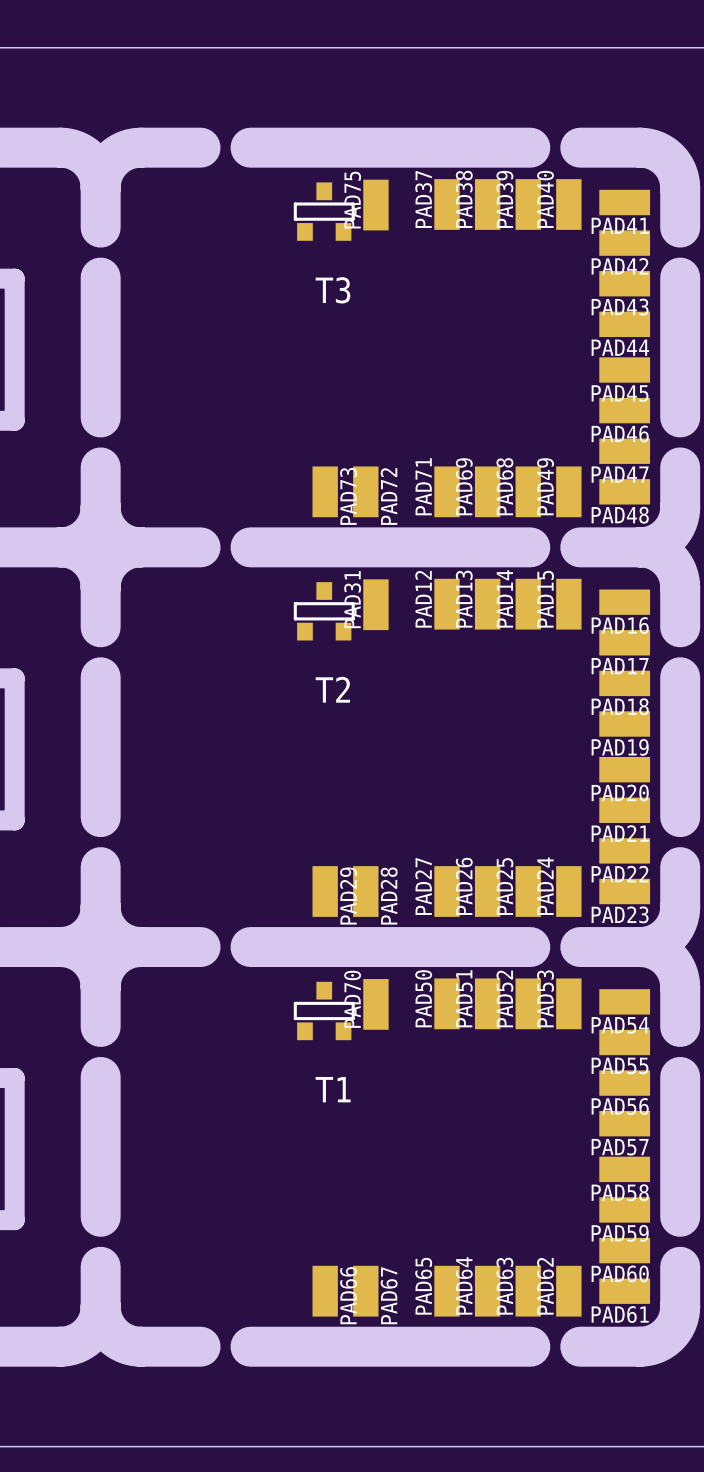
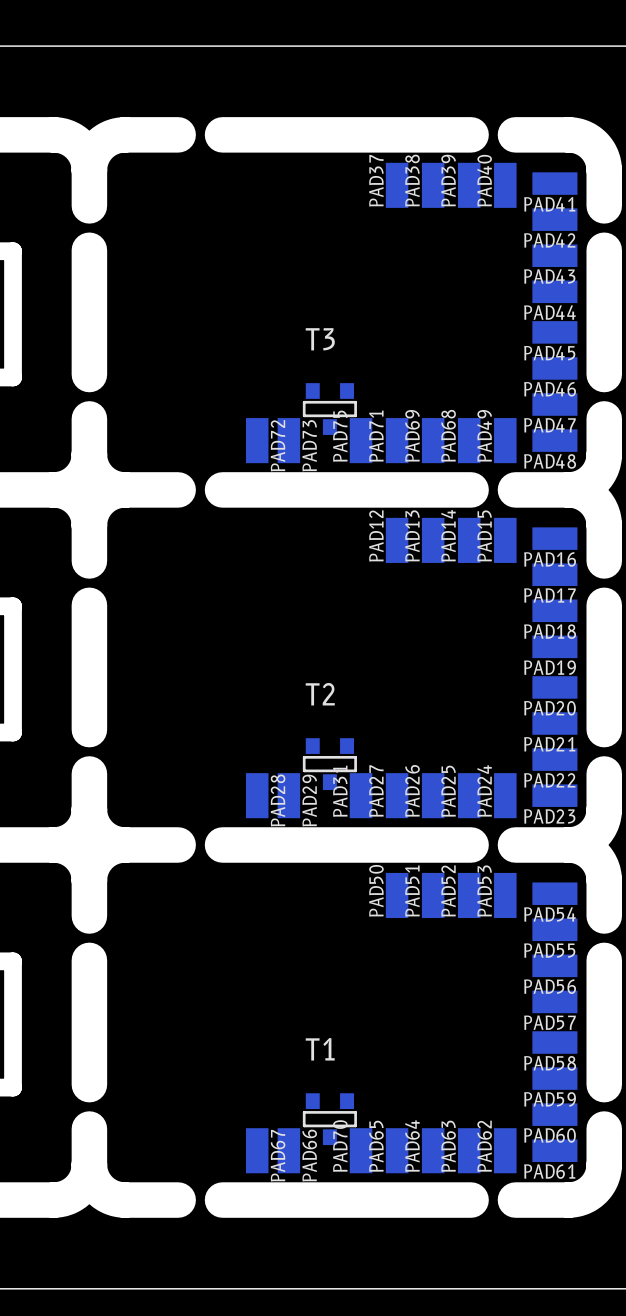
PAD75 position: (375, 205) -> (361, 440)
T3 rotation: 0° (324, 211) -> 180° (329, 409)
T3 position: (324, 211) -> (329, 409)
PAD72 position: (365, 491) -> (257, 440)
PAD31 position: (375, 604) -> (361, 795)
T2 rotation: 0° (324, 611) -> 180° (329, 764)
T2 position: (324, 611) -> (329, 764)
PAD28 position: (365, 891) -> (257, 795)
PAD70 position: (375, 1004) -> (361, 1150)
T1 rotation: 0° (324, 1010) -> 180° (329, 1119)
T1 position: (324, 1010) -> (329, 1119)
PAD67 position: (365, 1291) -> (257, 1150)

